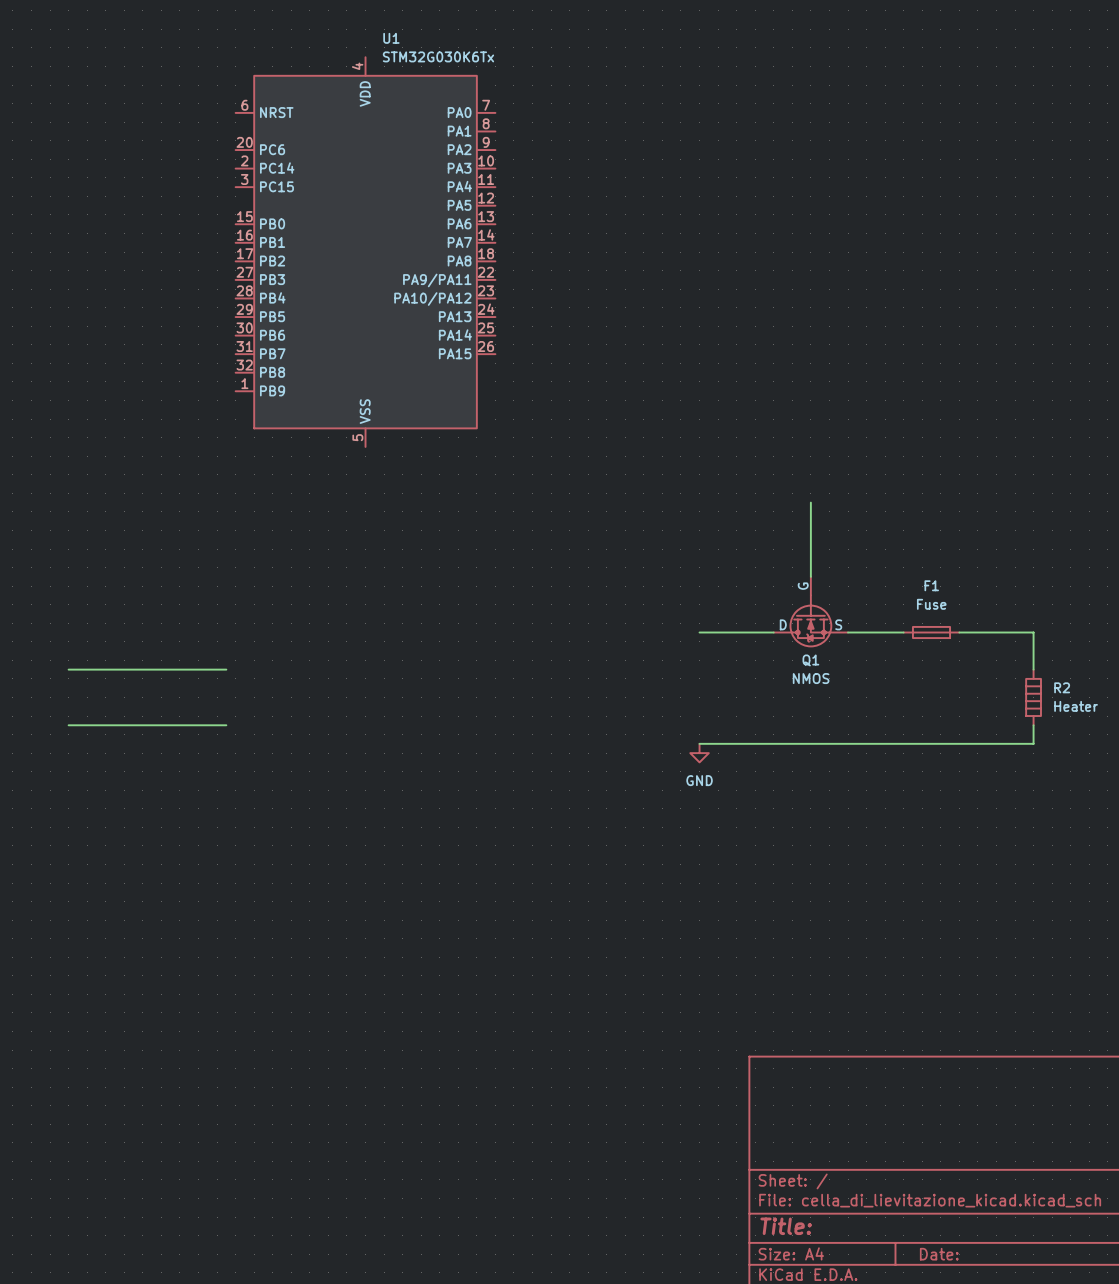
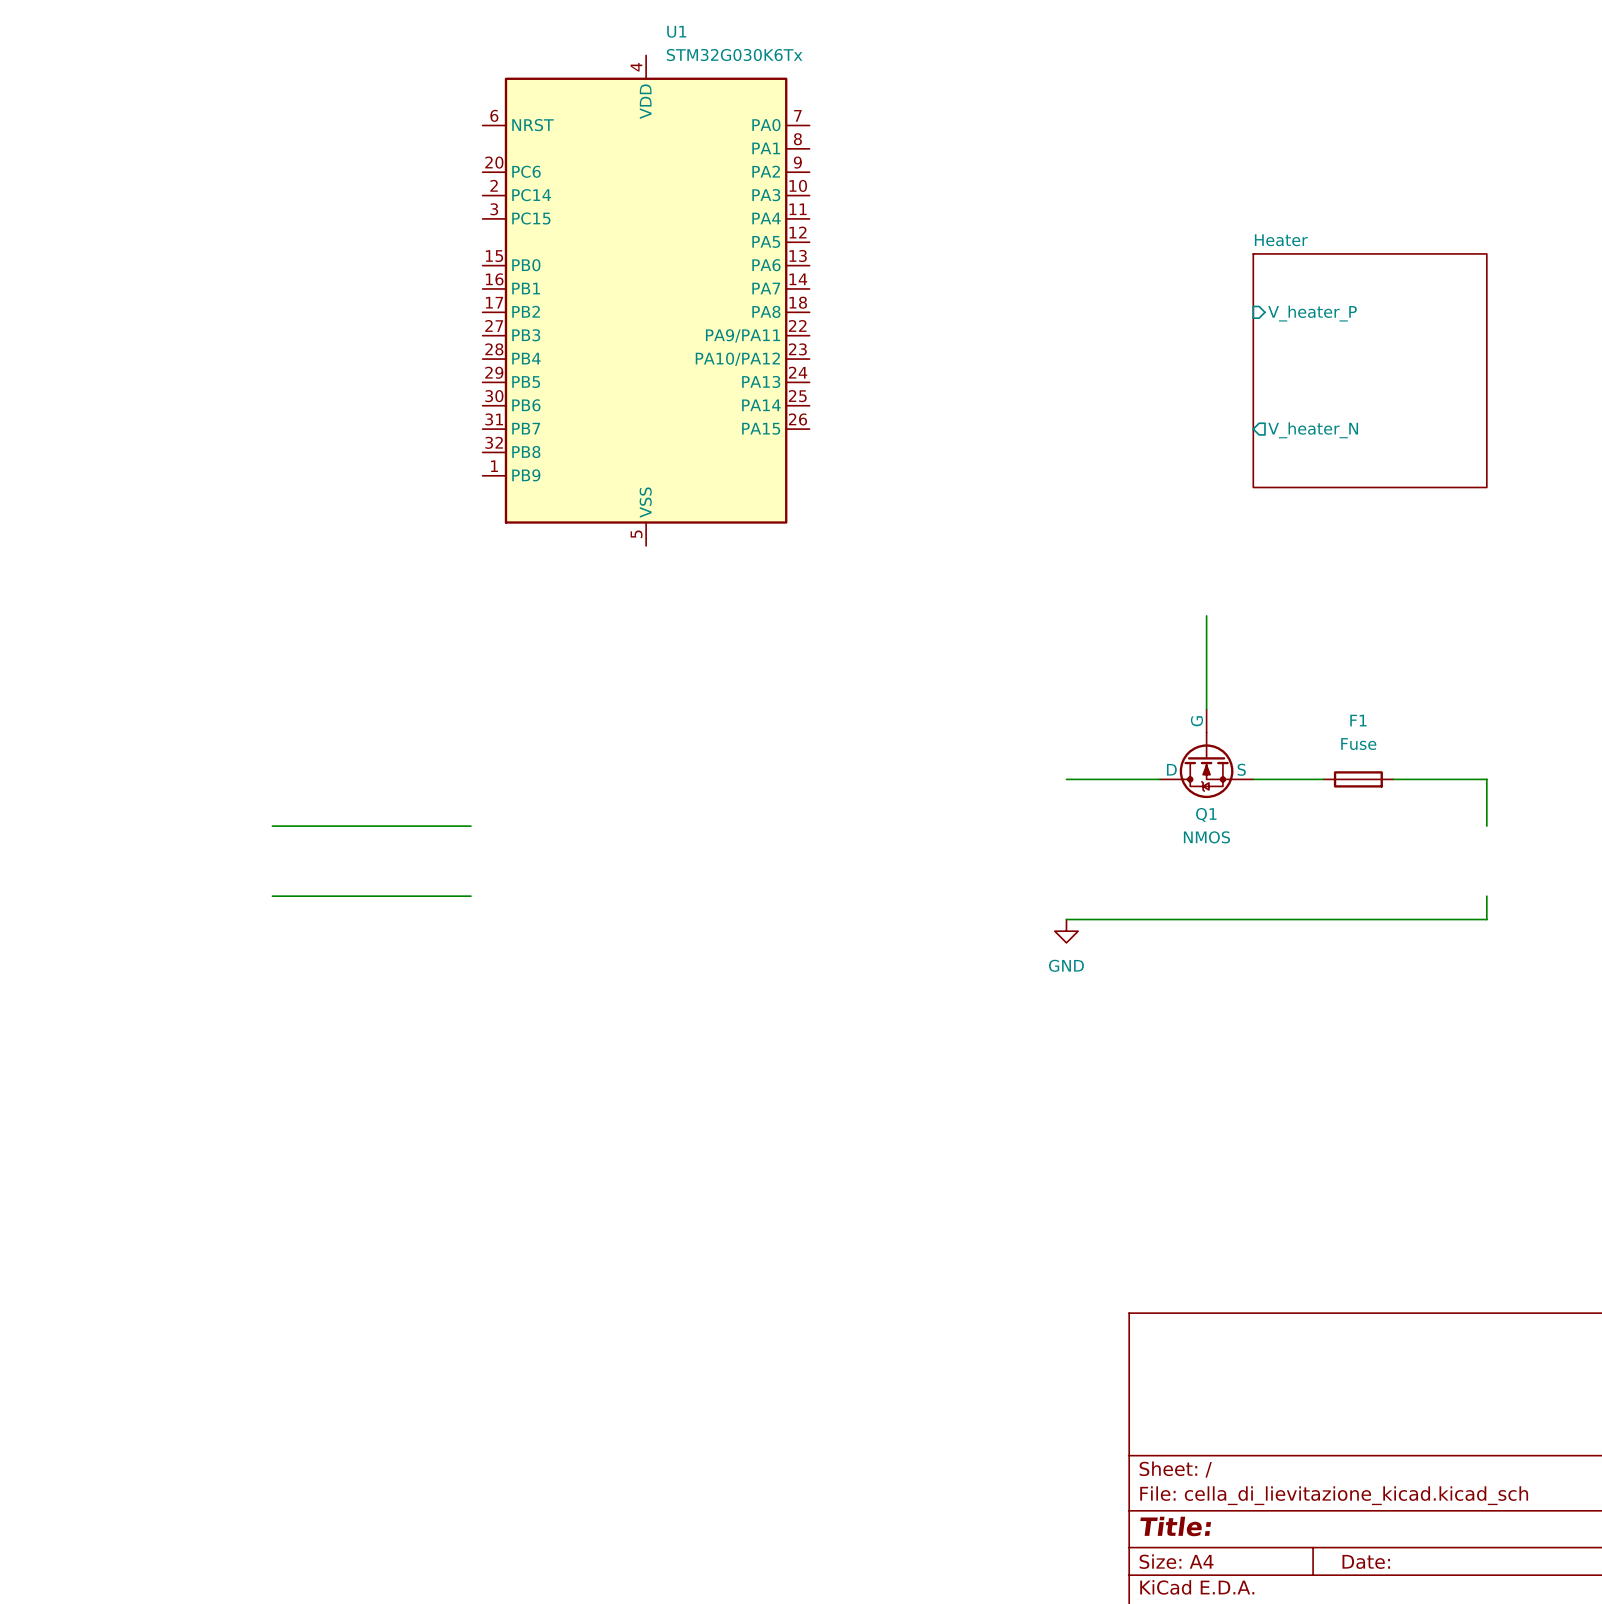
sheet pin: none -> V_heater_P (1312, 313)
sheet Heater: none -> (1370, 370)
sheet pin: none -> V_heater_N (1313, 430)
R2: Heater (1033, 697) -> none

